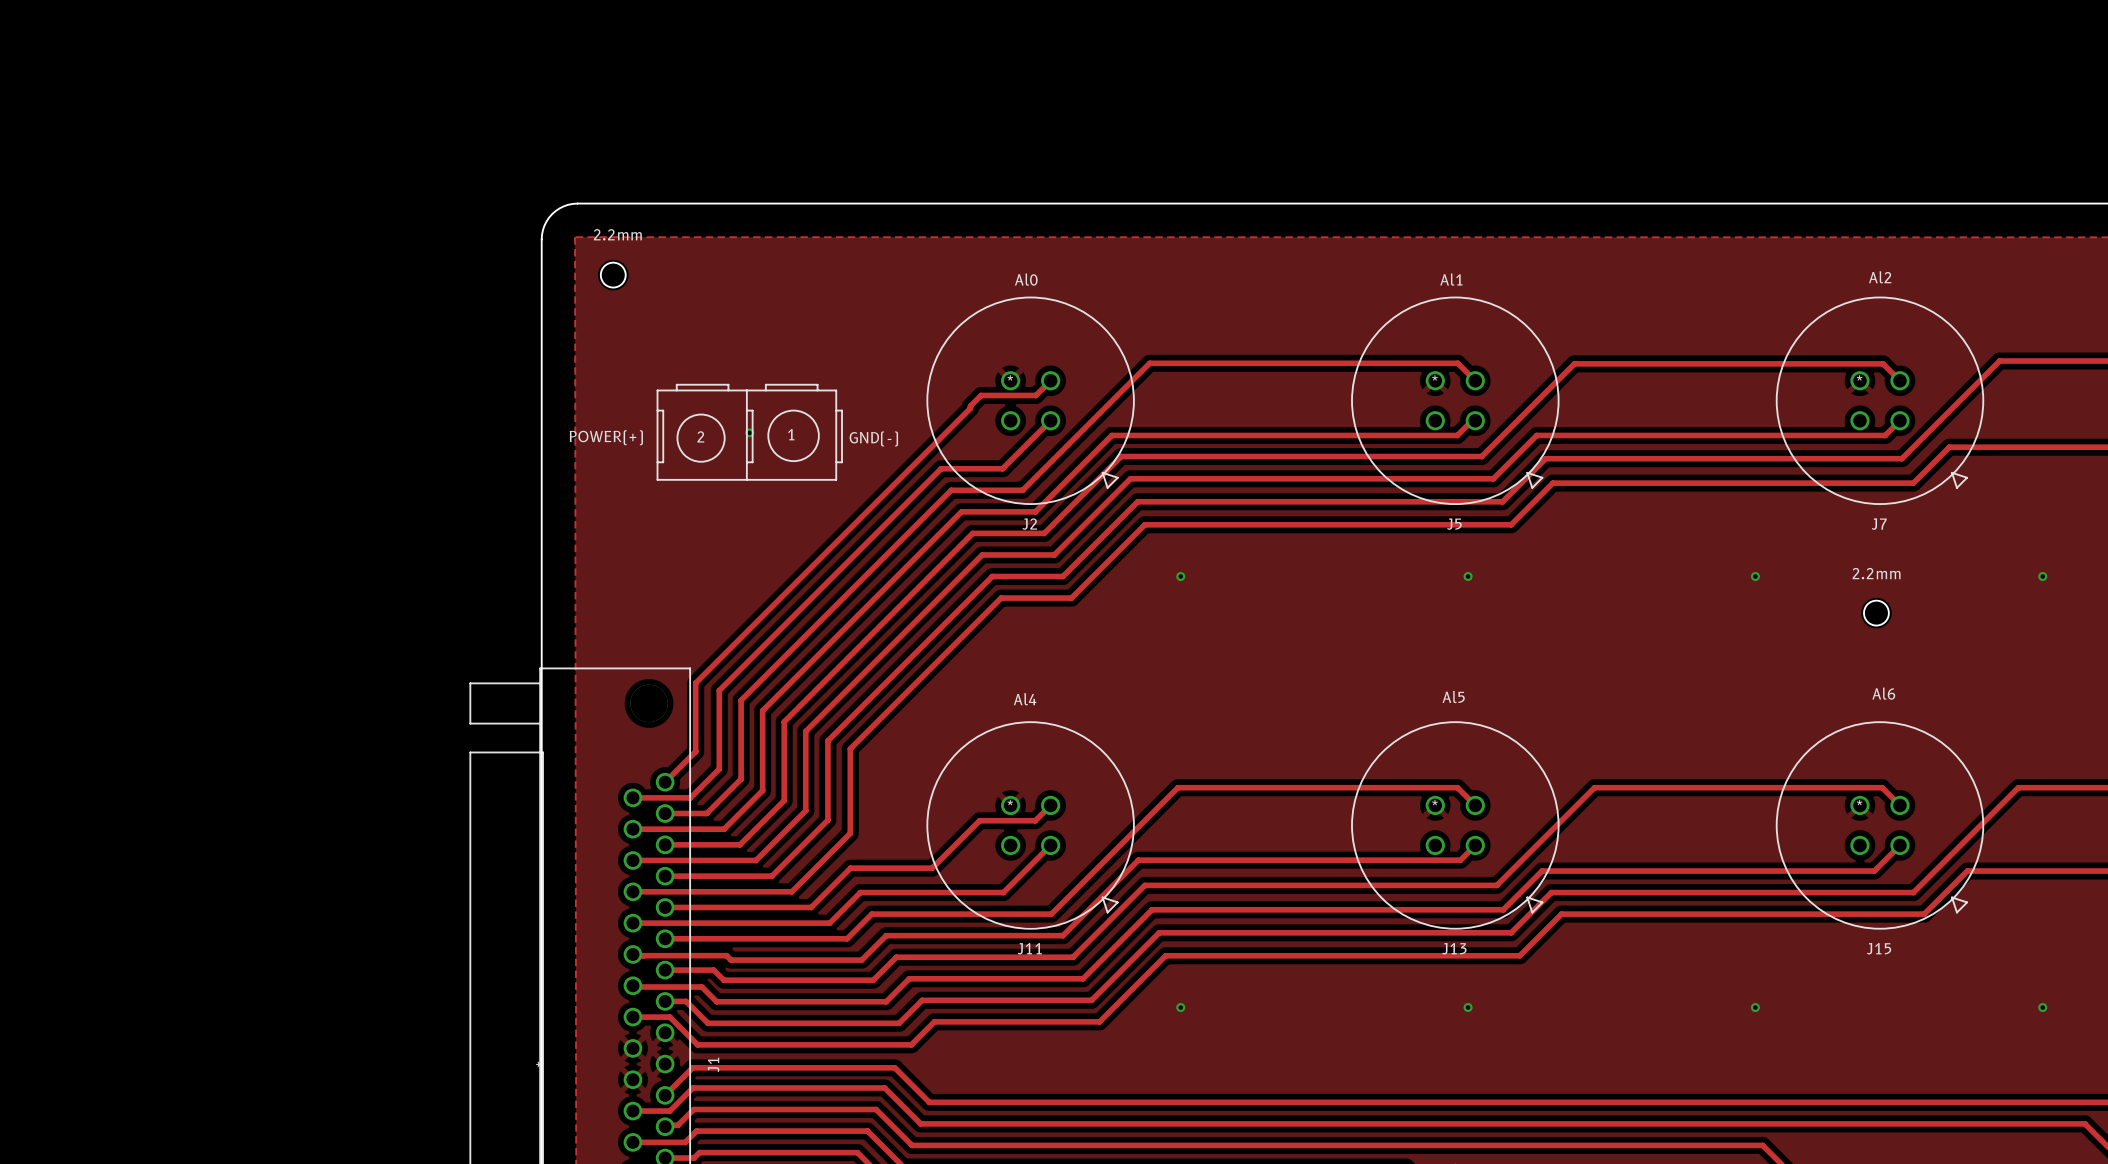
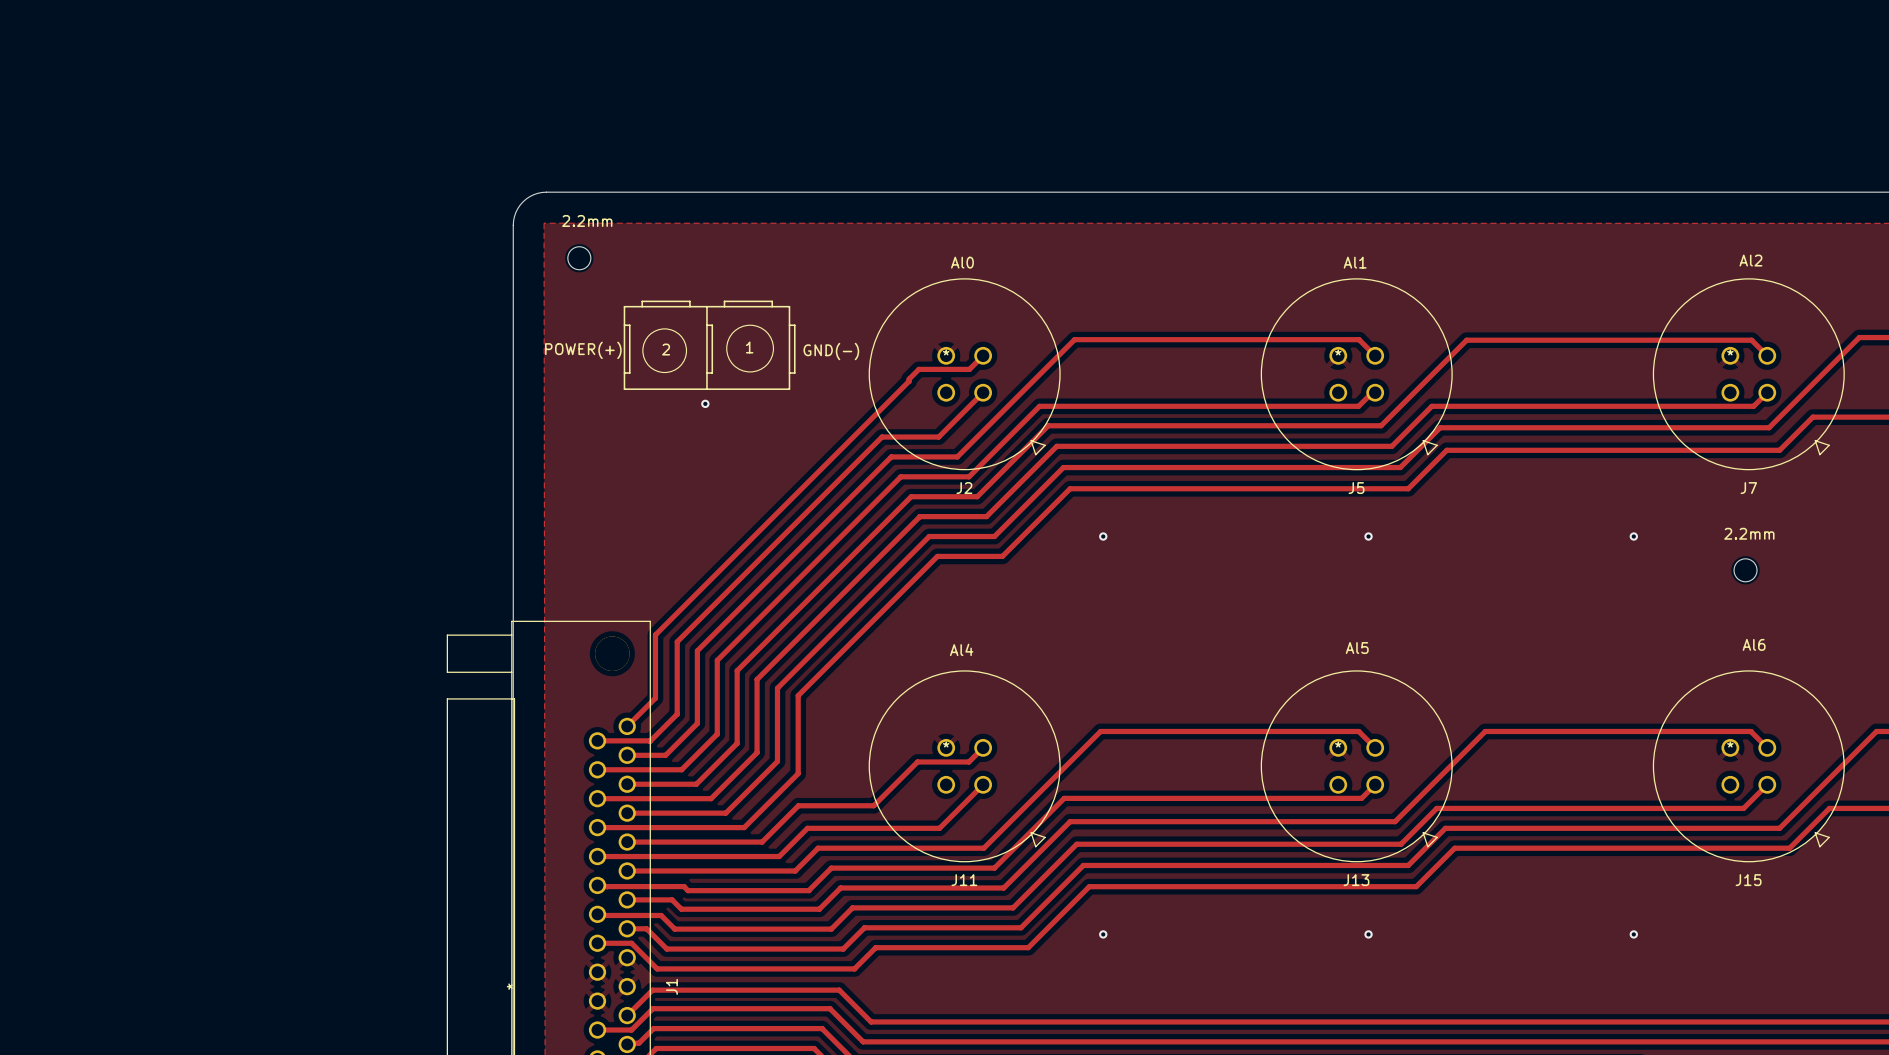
drawing position: (749, 432) -> (709, 345)
text position: 1 (791, 434) -> 1 (749, 347)
text position: 2 (700, 436) -> 2 (666, 349)
text position: POWER(+) (606, 437) -> POWER(+) (583, 350)
text position: GND(-) (873, 438) -> GND(-) (831, 351)

